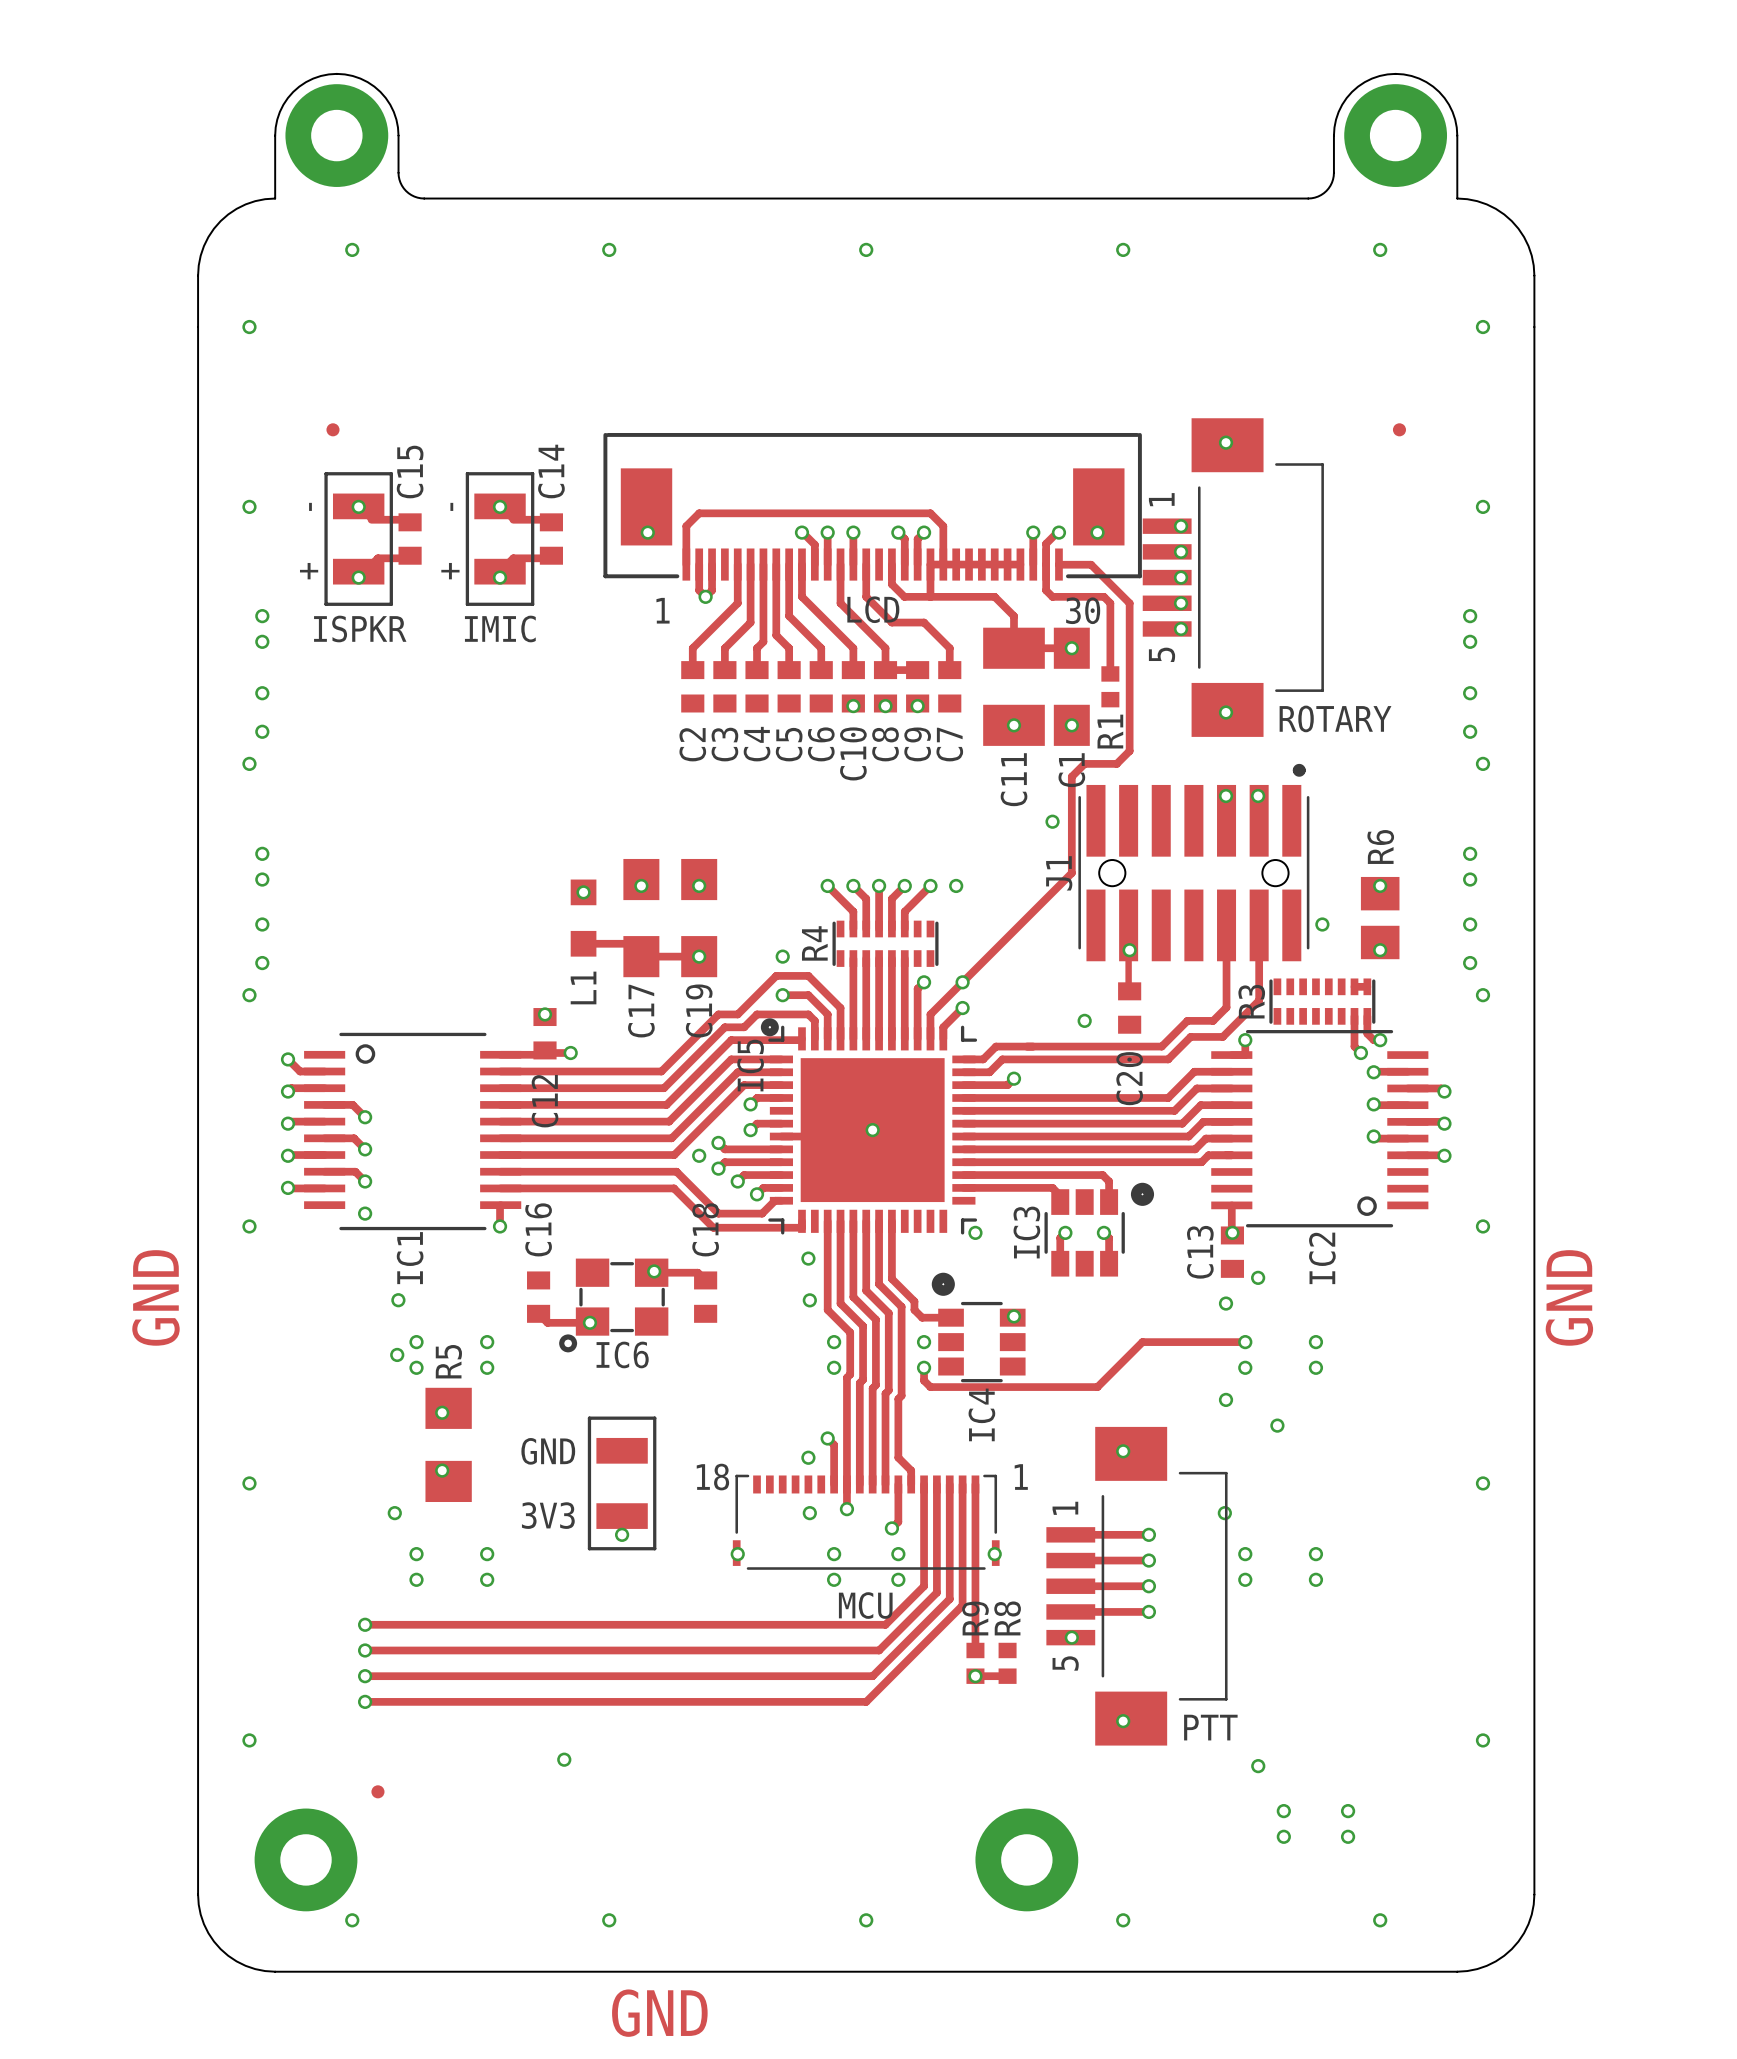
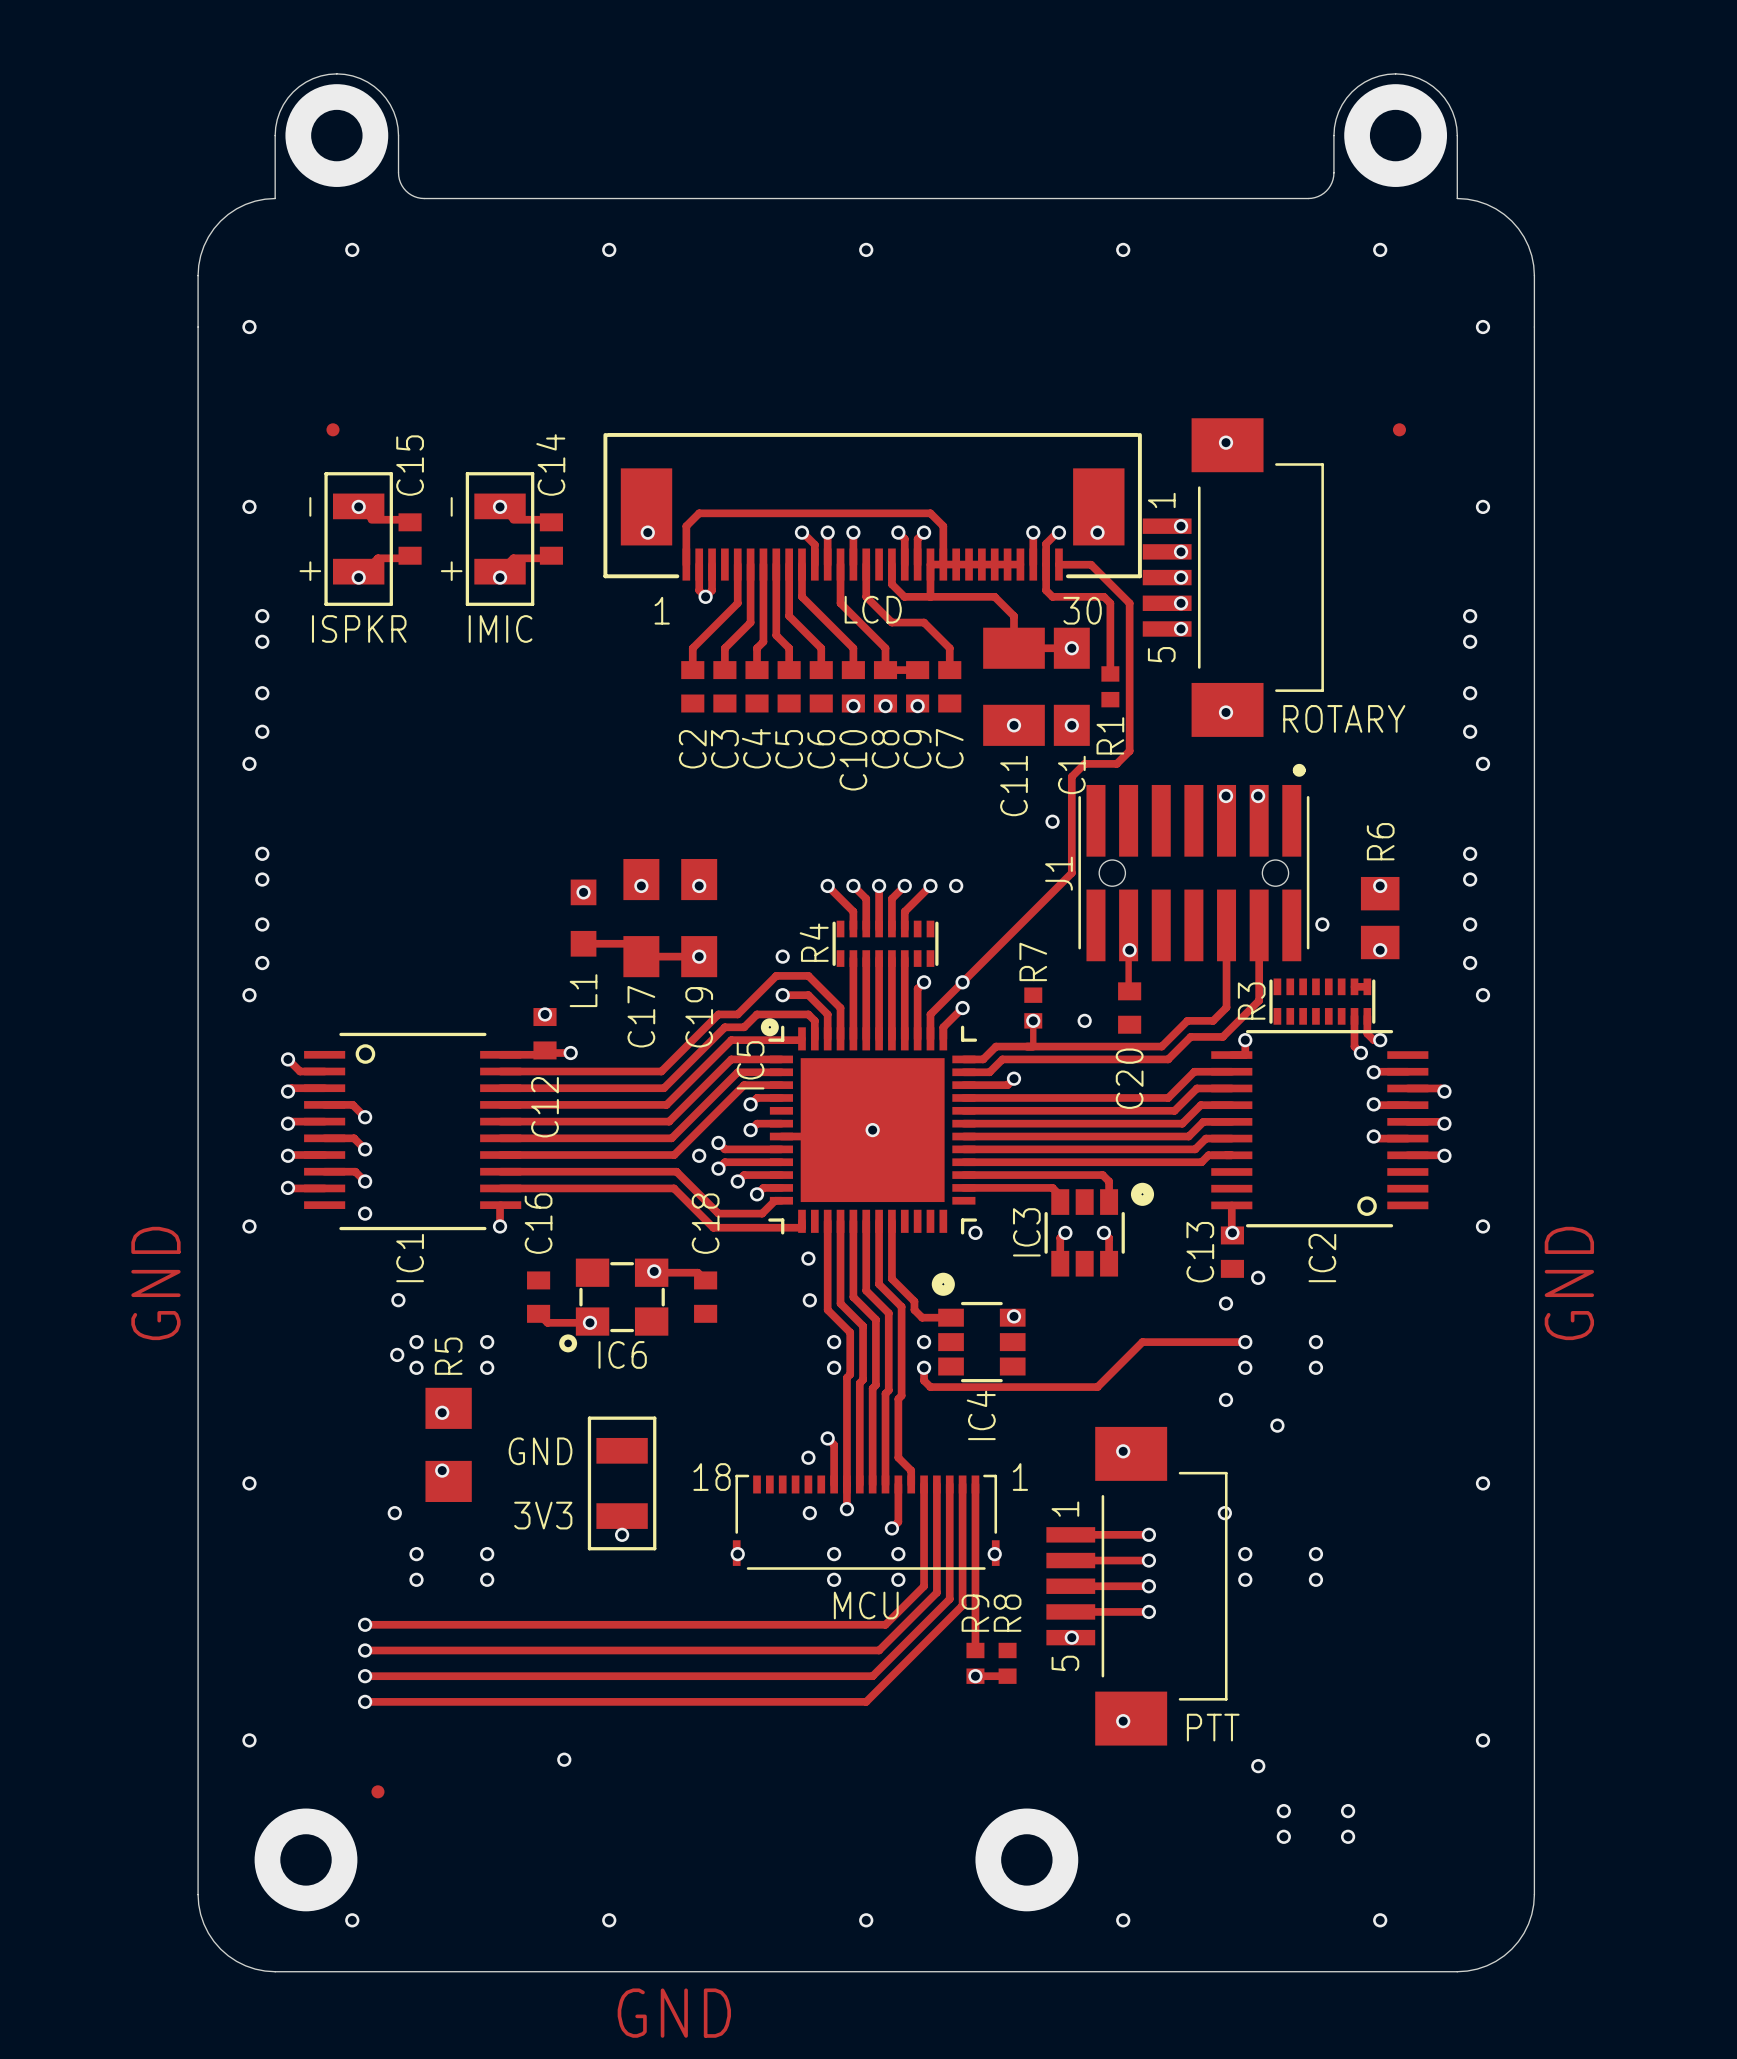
R7: none -> (1033, 1008)
track: none -> (1033, 1020) (1033, 1046)
via: none -> (1033, 1020)

